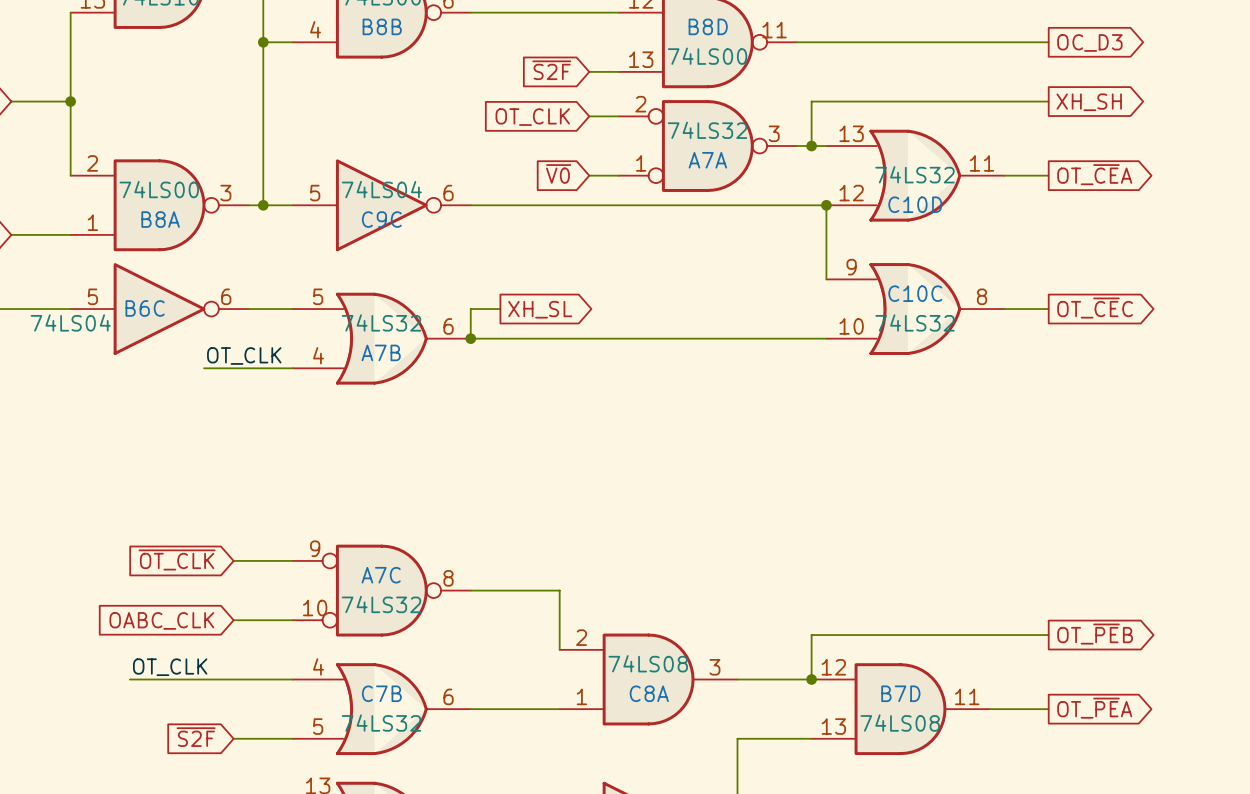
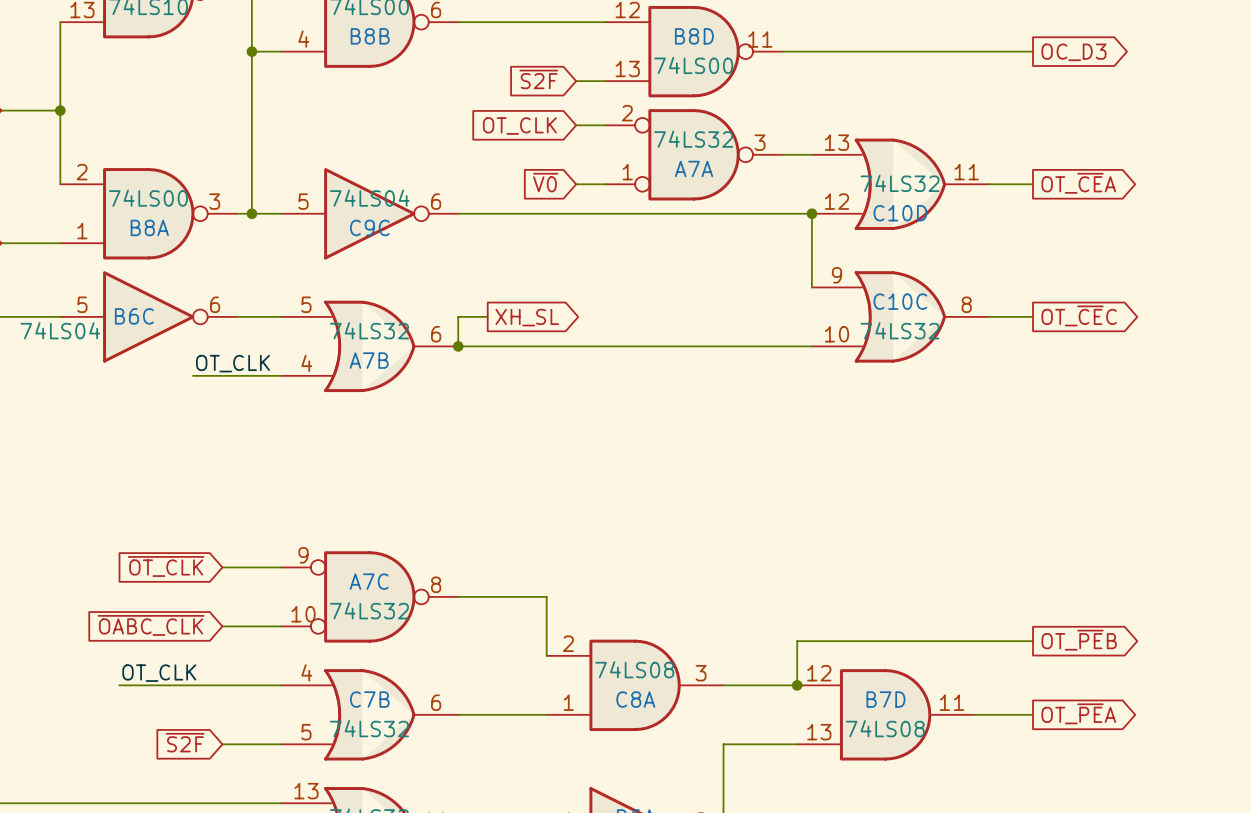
wire: (1048, 101) (811, 101) (811, 146) -> none
global label: XH_SH (1089, 102) -> none
junction: (811, 146) -> none
global label: OABC_CLK (161, 620) -> ~{OABC_CLK} (151, 625)

